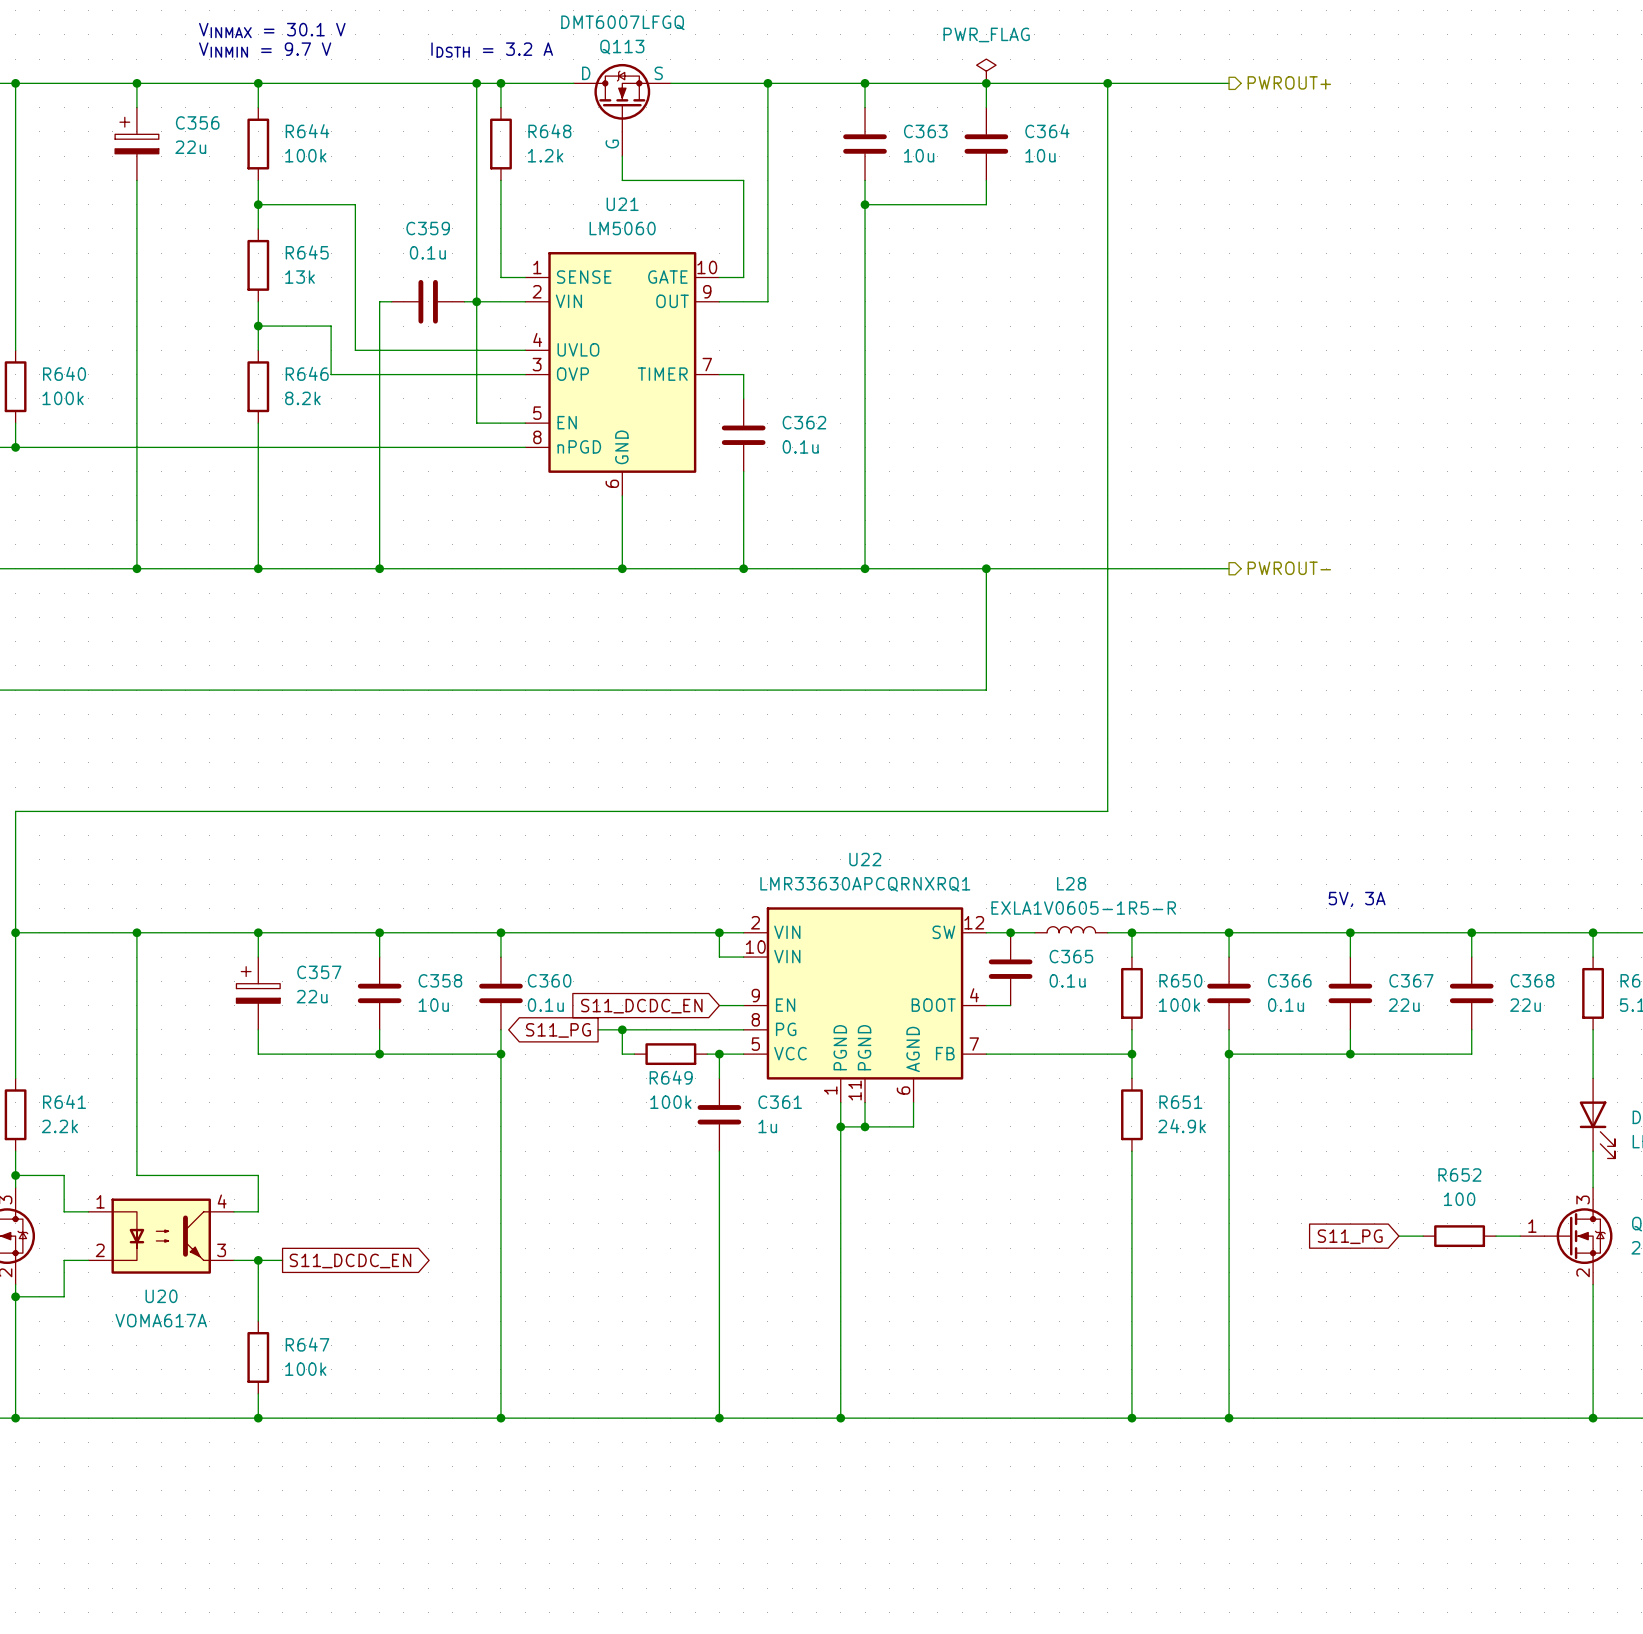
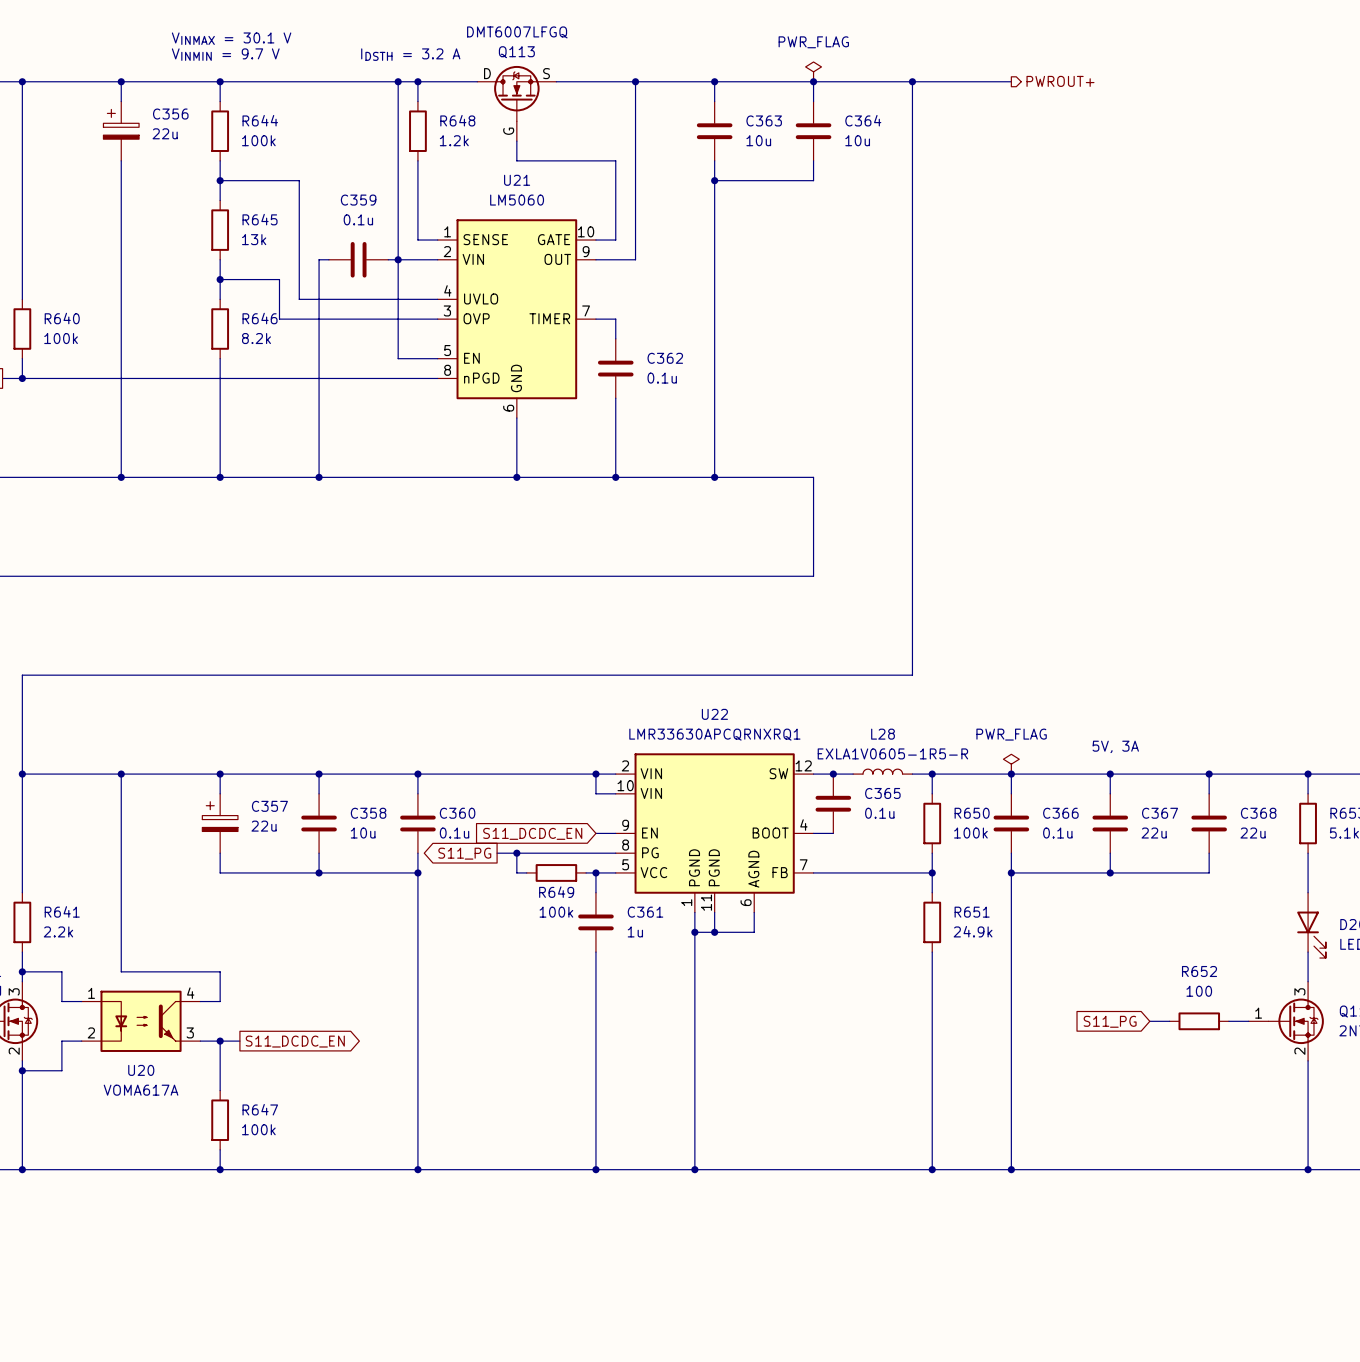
wire: (986, 568) (1229, 568) -> none
junction: (986, 568) -> none
hierarchical label: PWROUT- (1289, 568) -> none
power symbol: none -> PWR_FLAG (1011, 764)

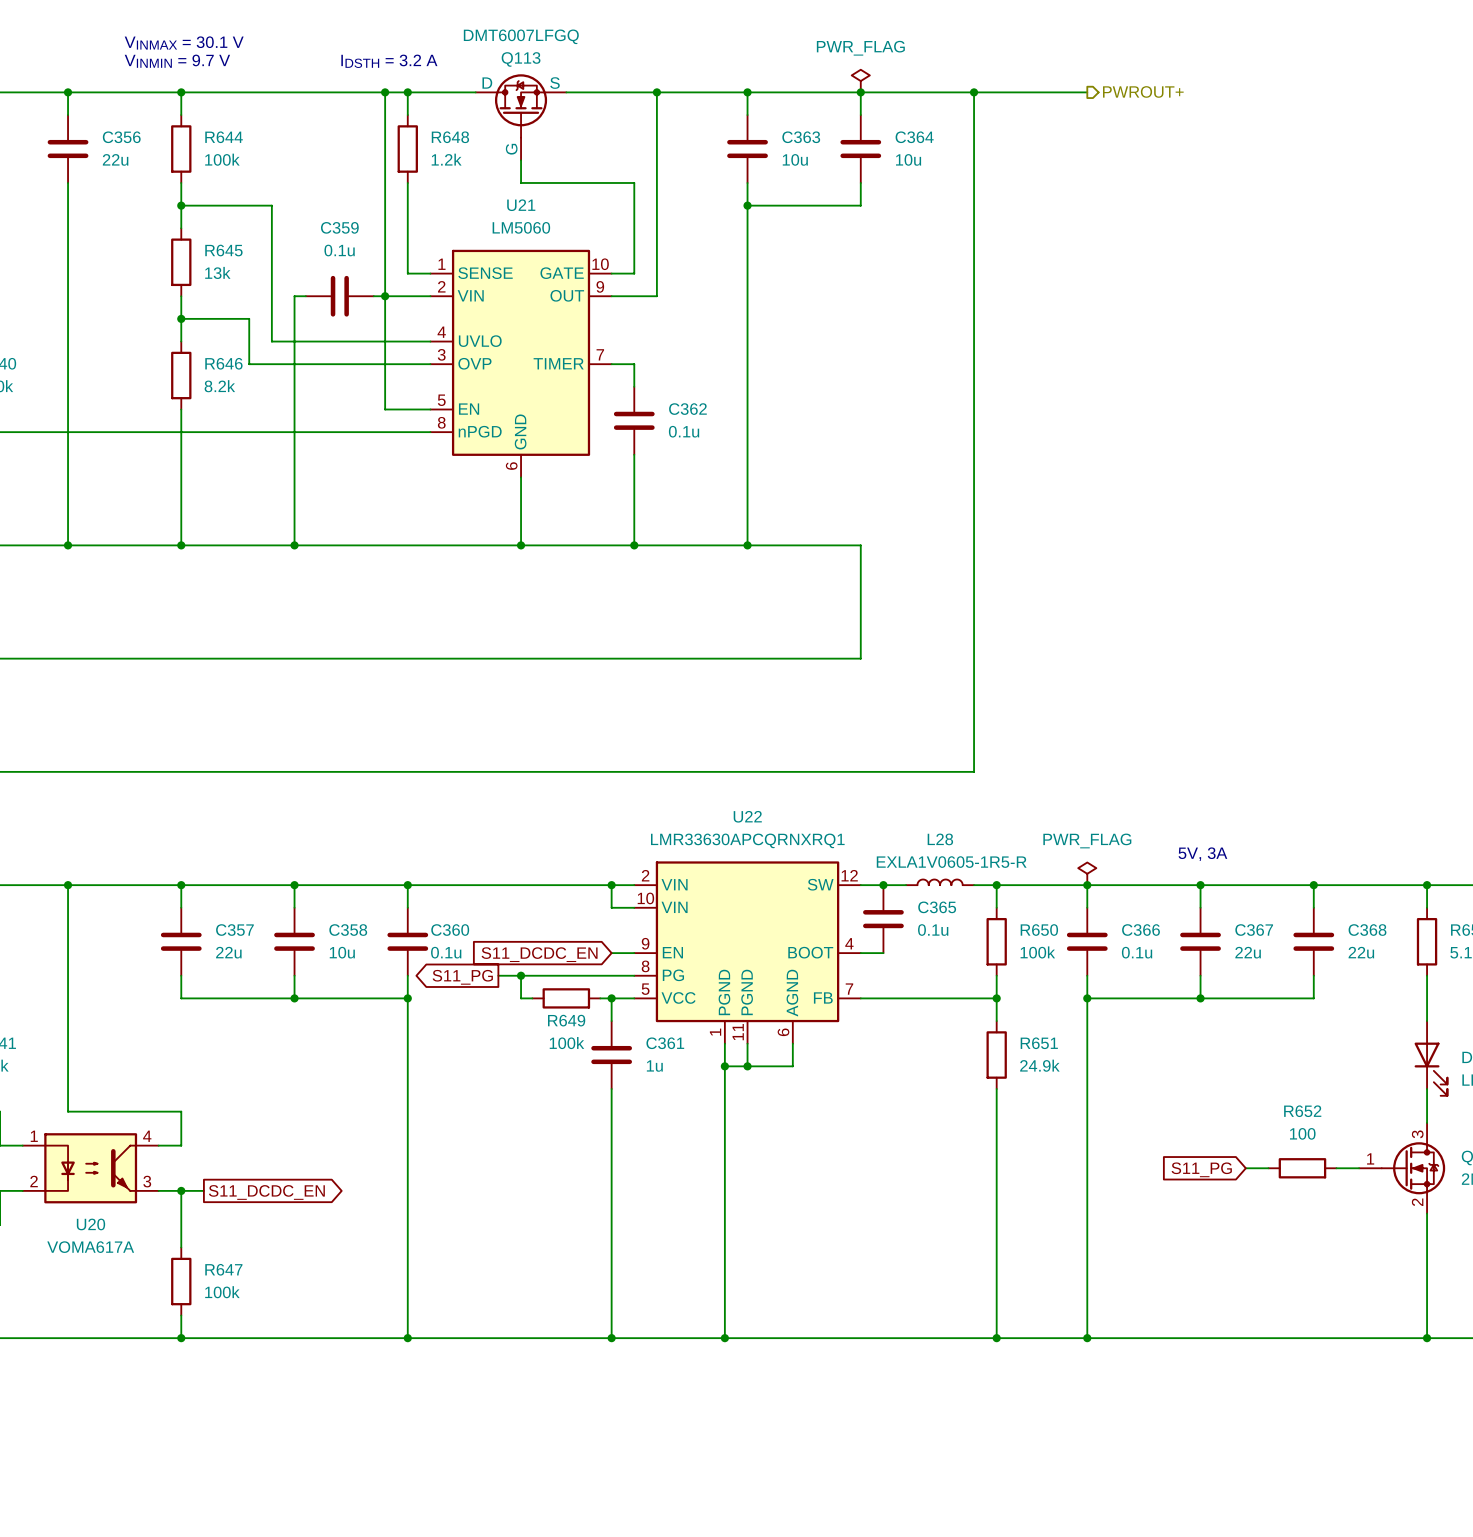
C356 symbol: [103, 101, 140, 161] -> [47, 115, 89, 183]
C357 symbol: [202, 793, 238, 854] -> [160, 907, 202, 976]

